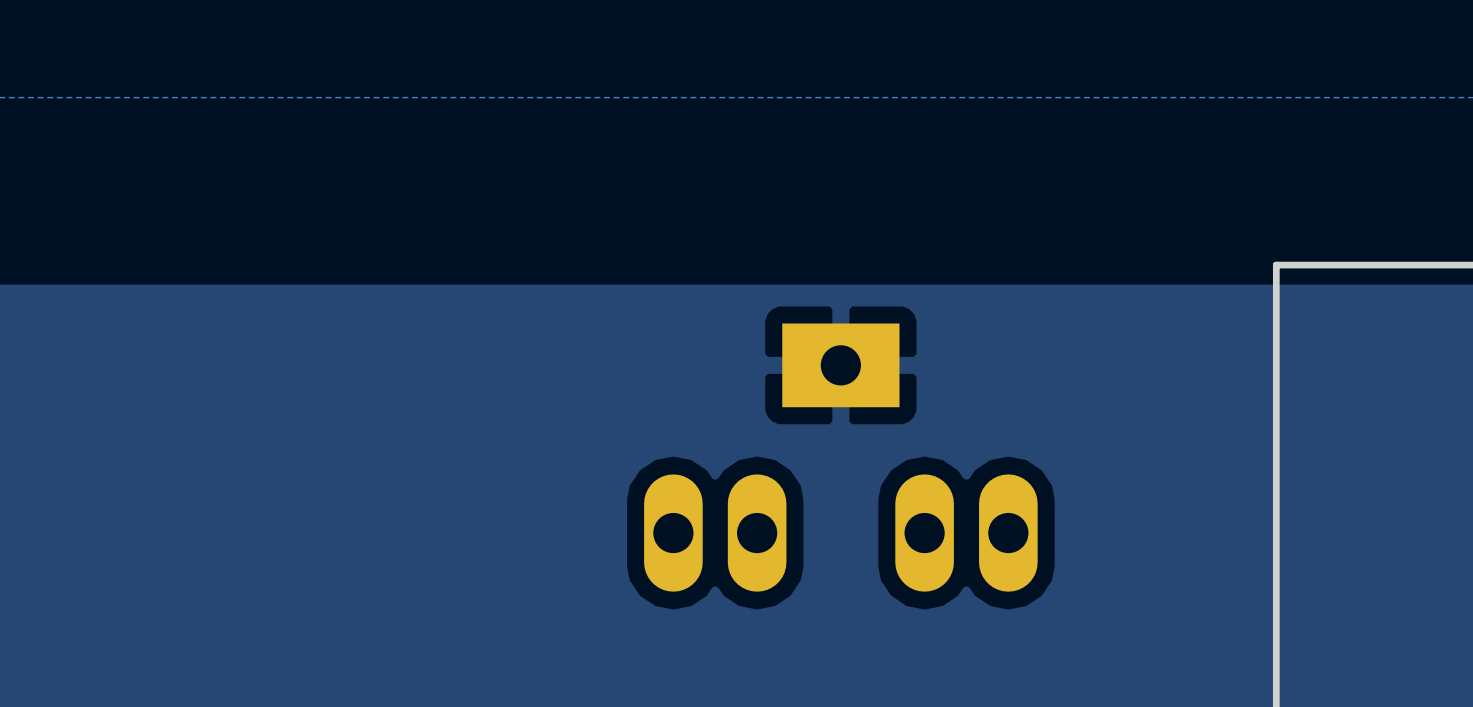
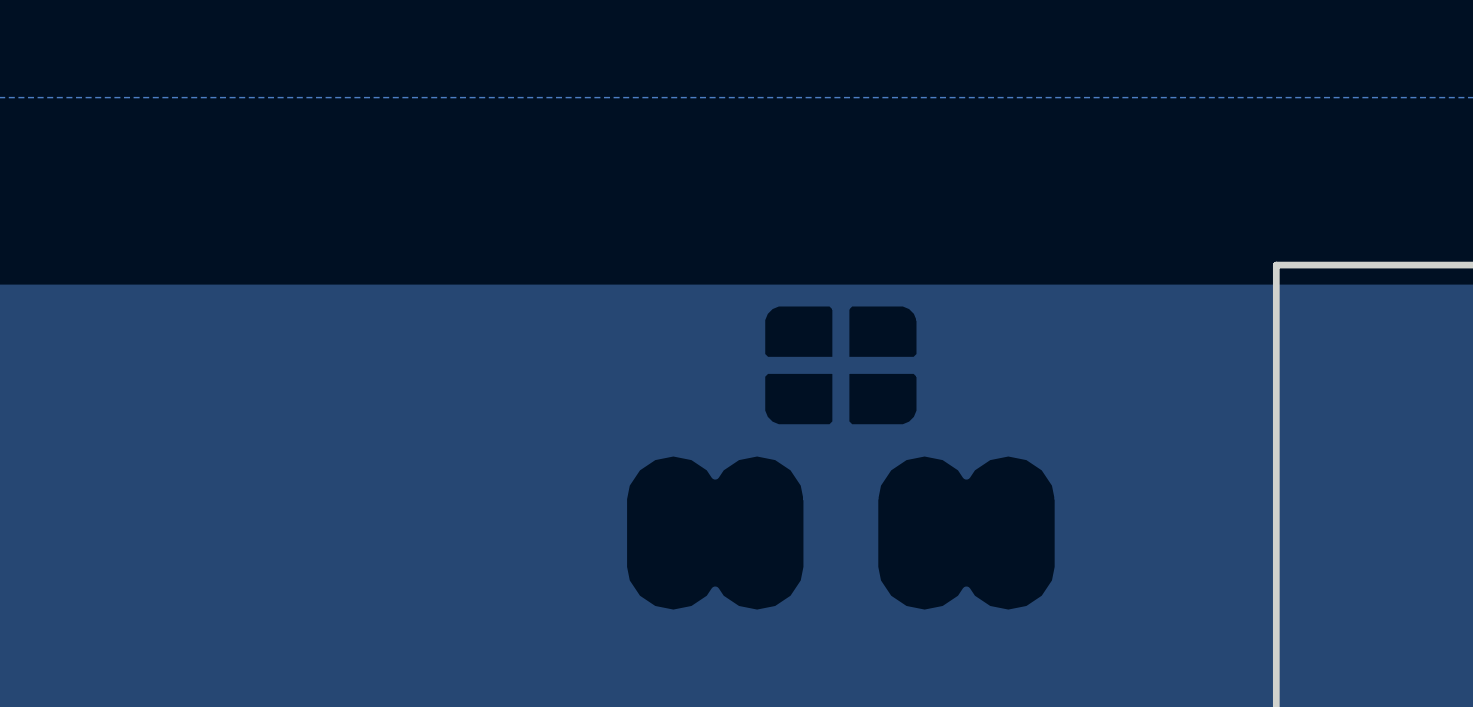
part: (840, 457) -> none

